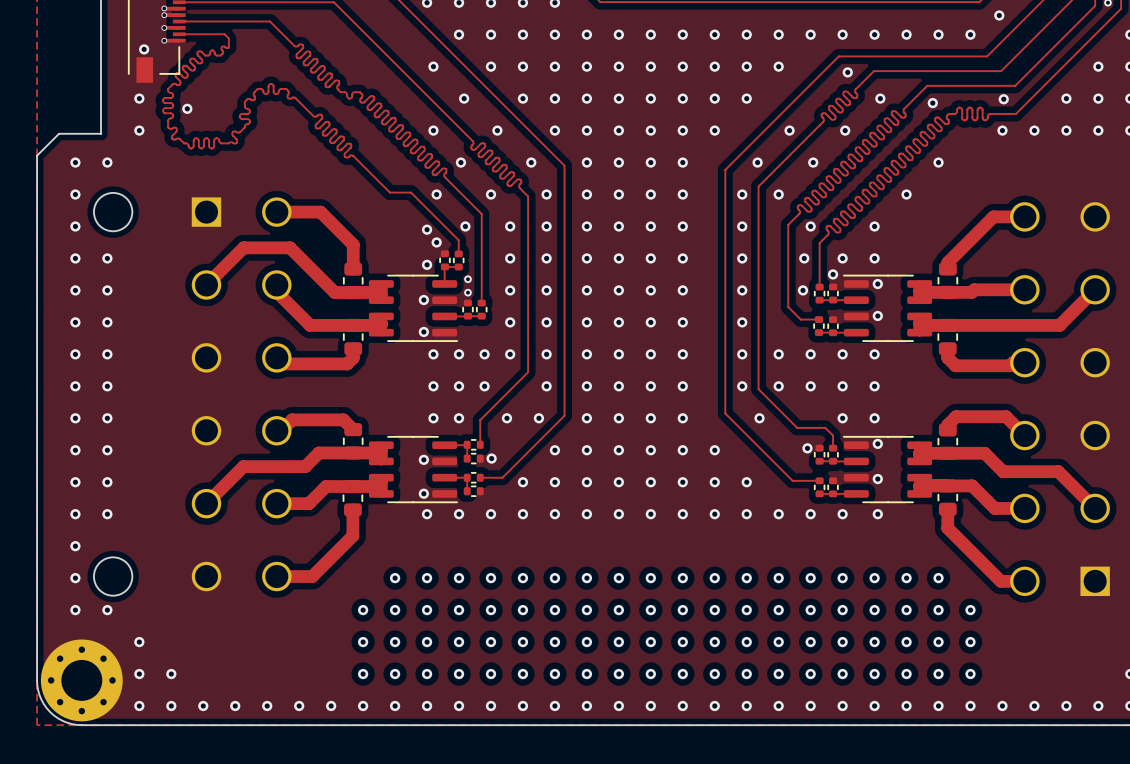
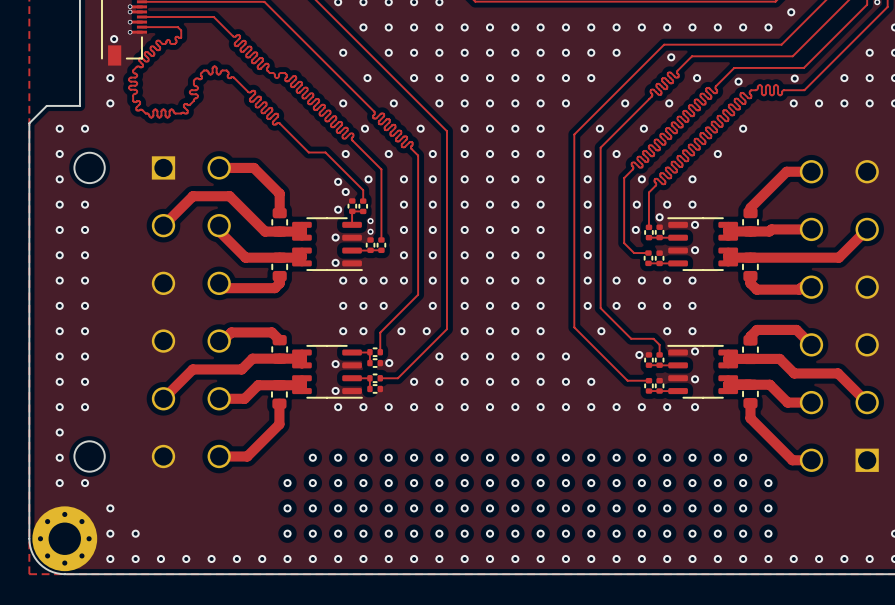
via: (187, 108) -> none

